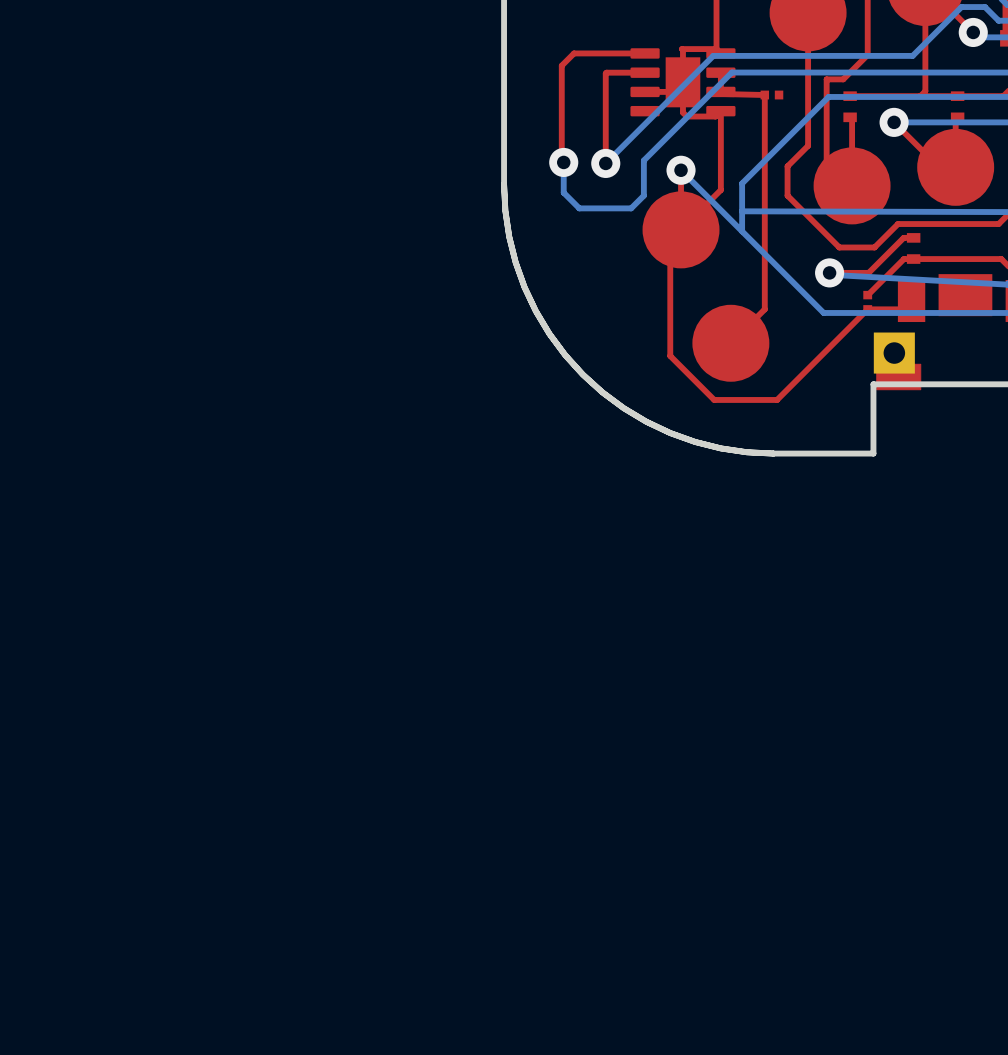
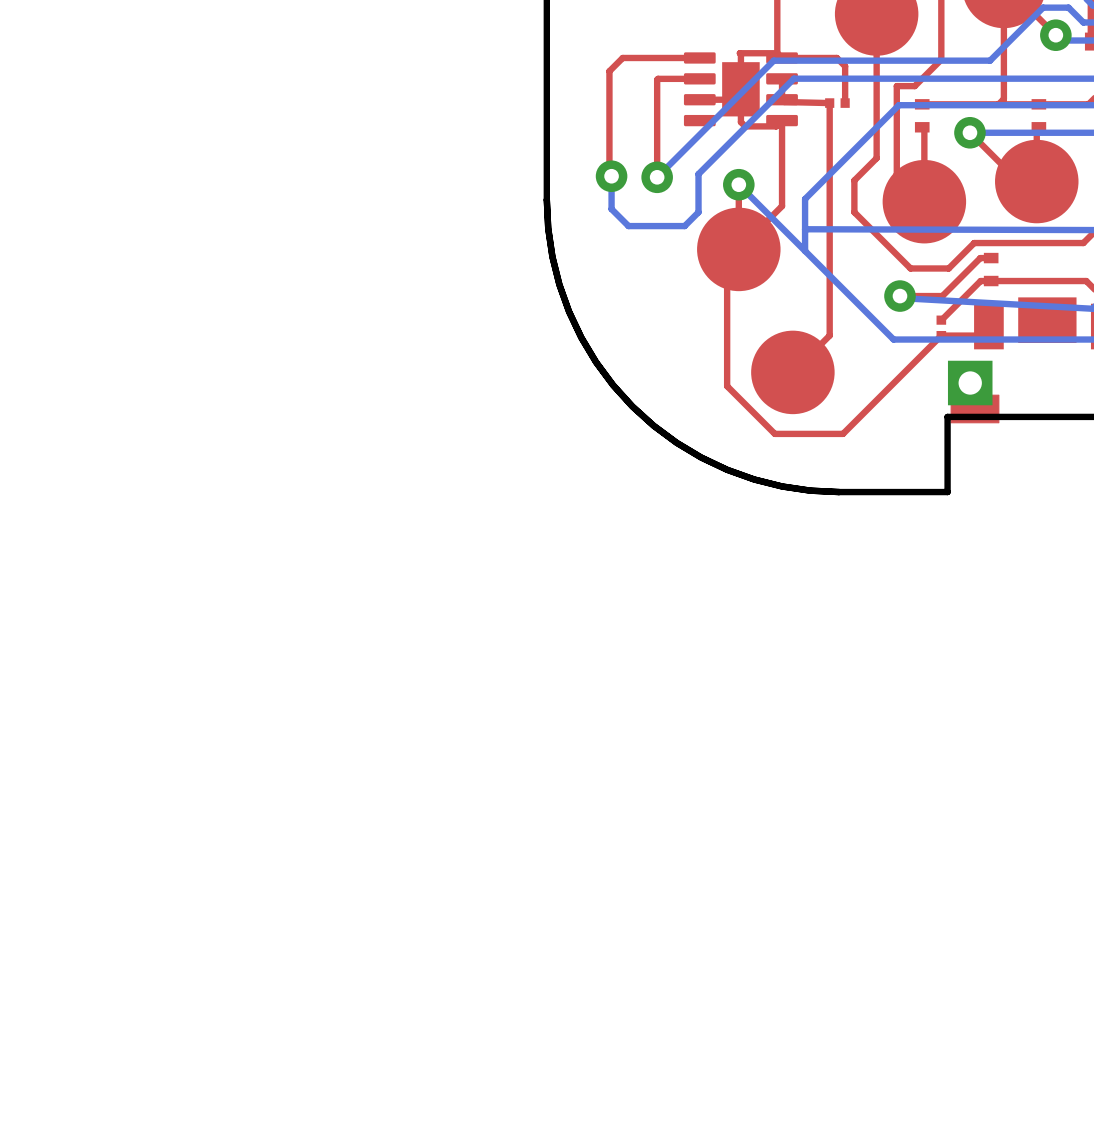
top track: none -> (782, 57) (836, 57) (845, 66) (845, 103)

